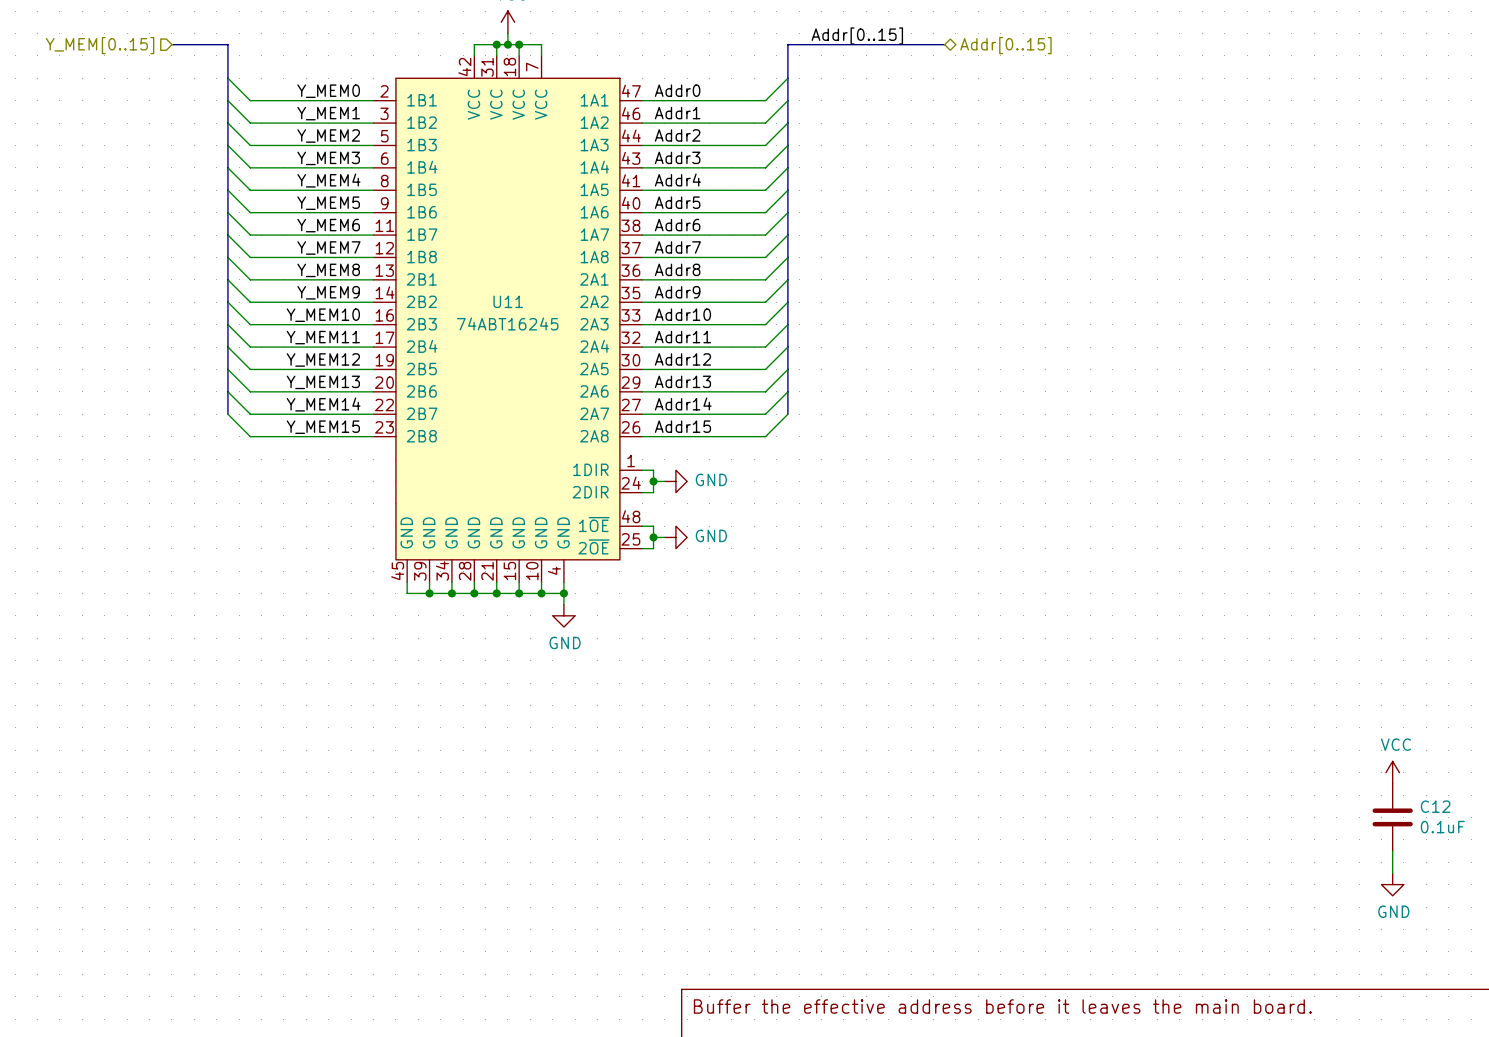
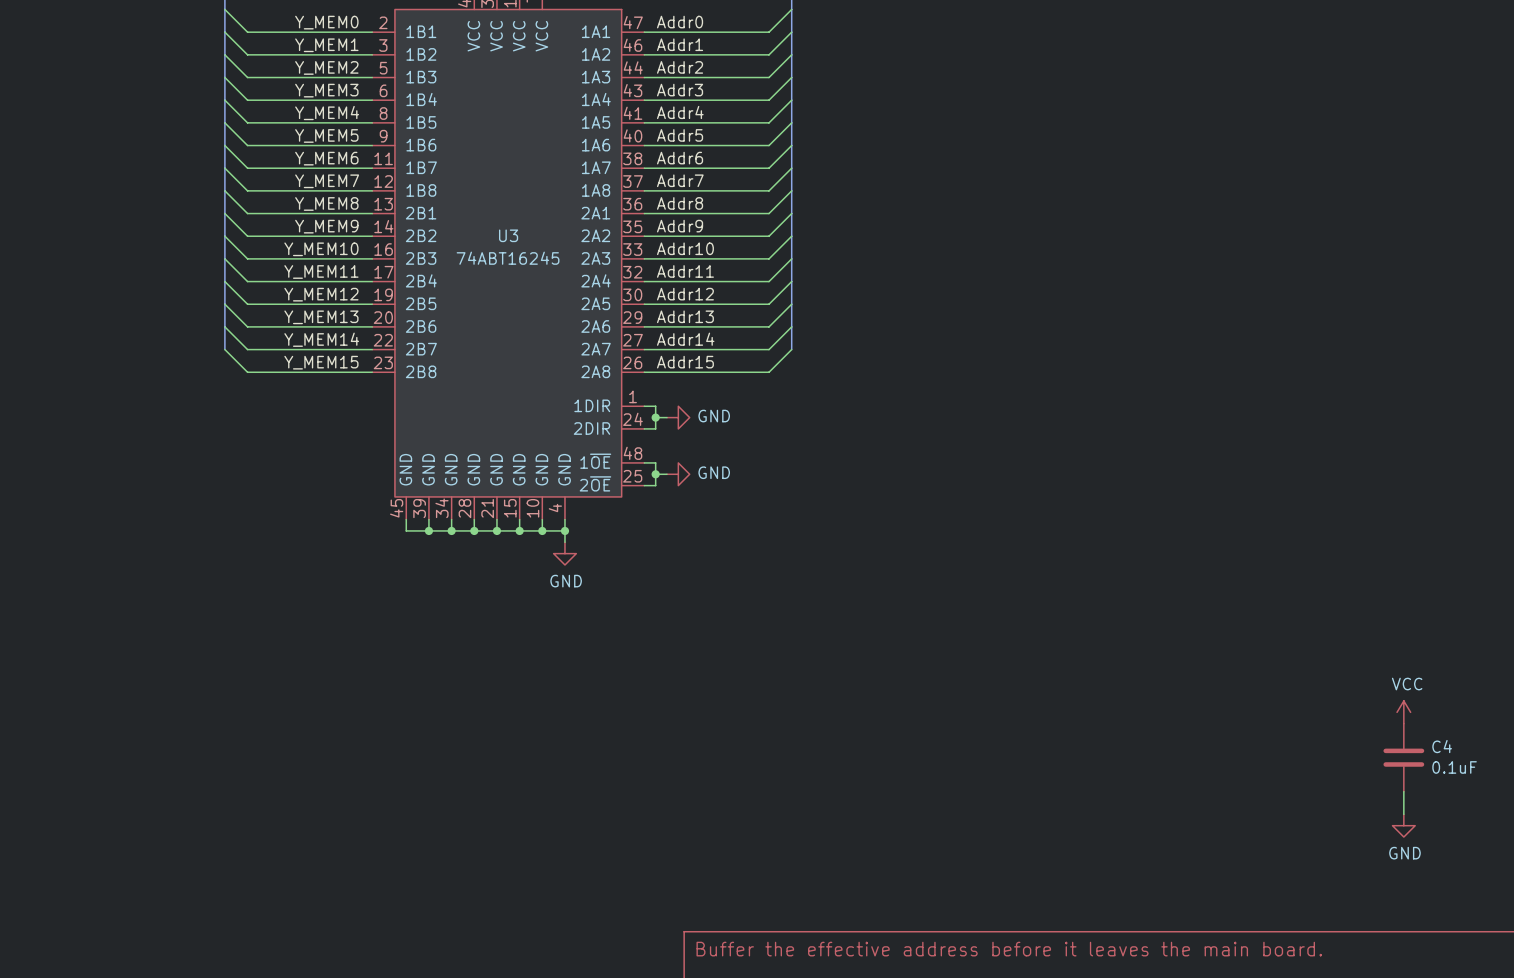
U11 name: U11 (508, 301) -> U3 (508, 235)
C12 name: C12 (1435, 806) -> C4 (1442, 746)

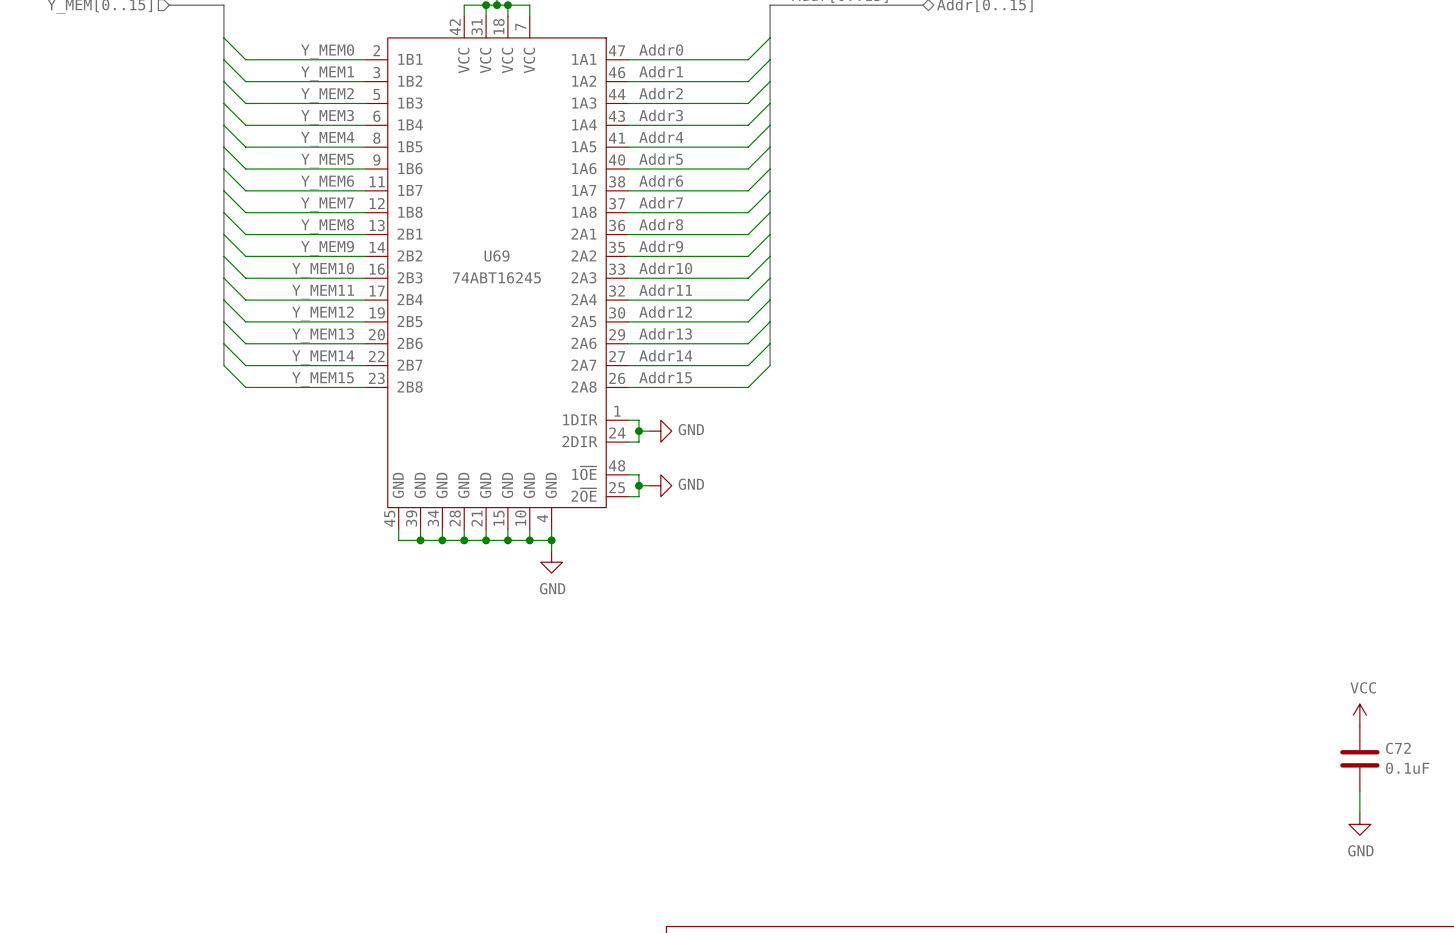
U3 name: U3 (508, 235) -> U69 (497, 255)
C4 name: C4 (1442, 746) -> C72 (1398, 748)

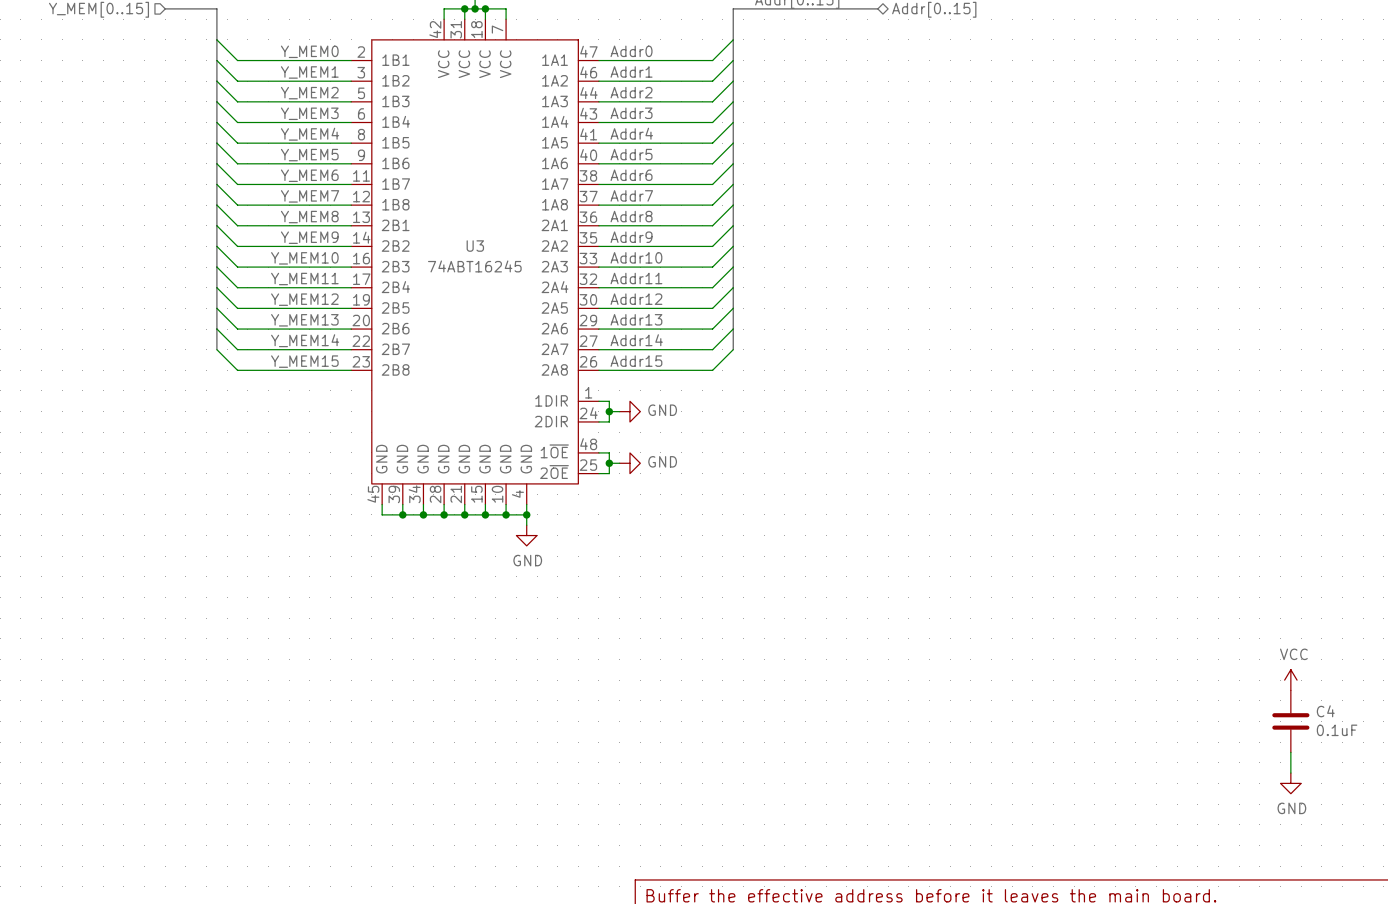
U69 name: U69 (497, 255) -> U3 (475, 246)
C72 name: C72 (1398, 748) -> C4 (1325, 711)

